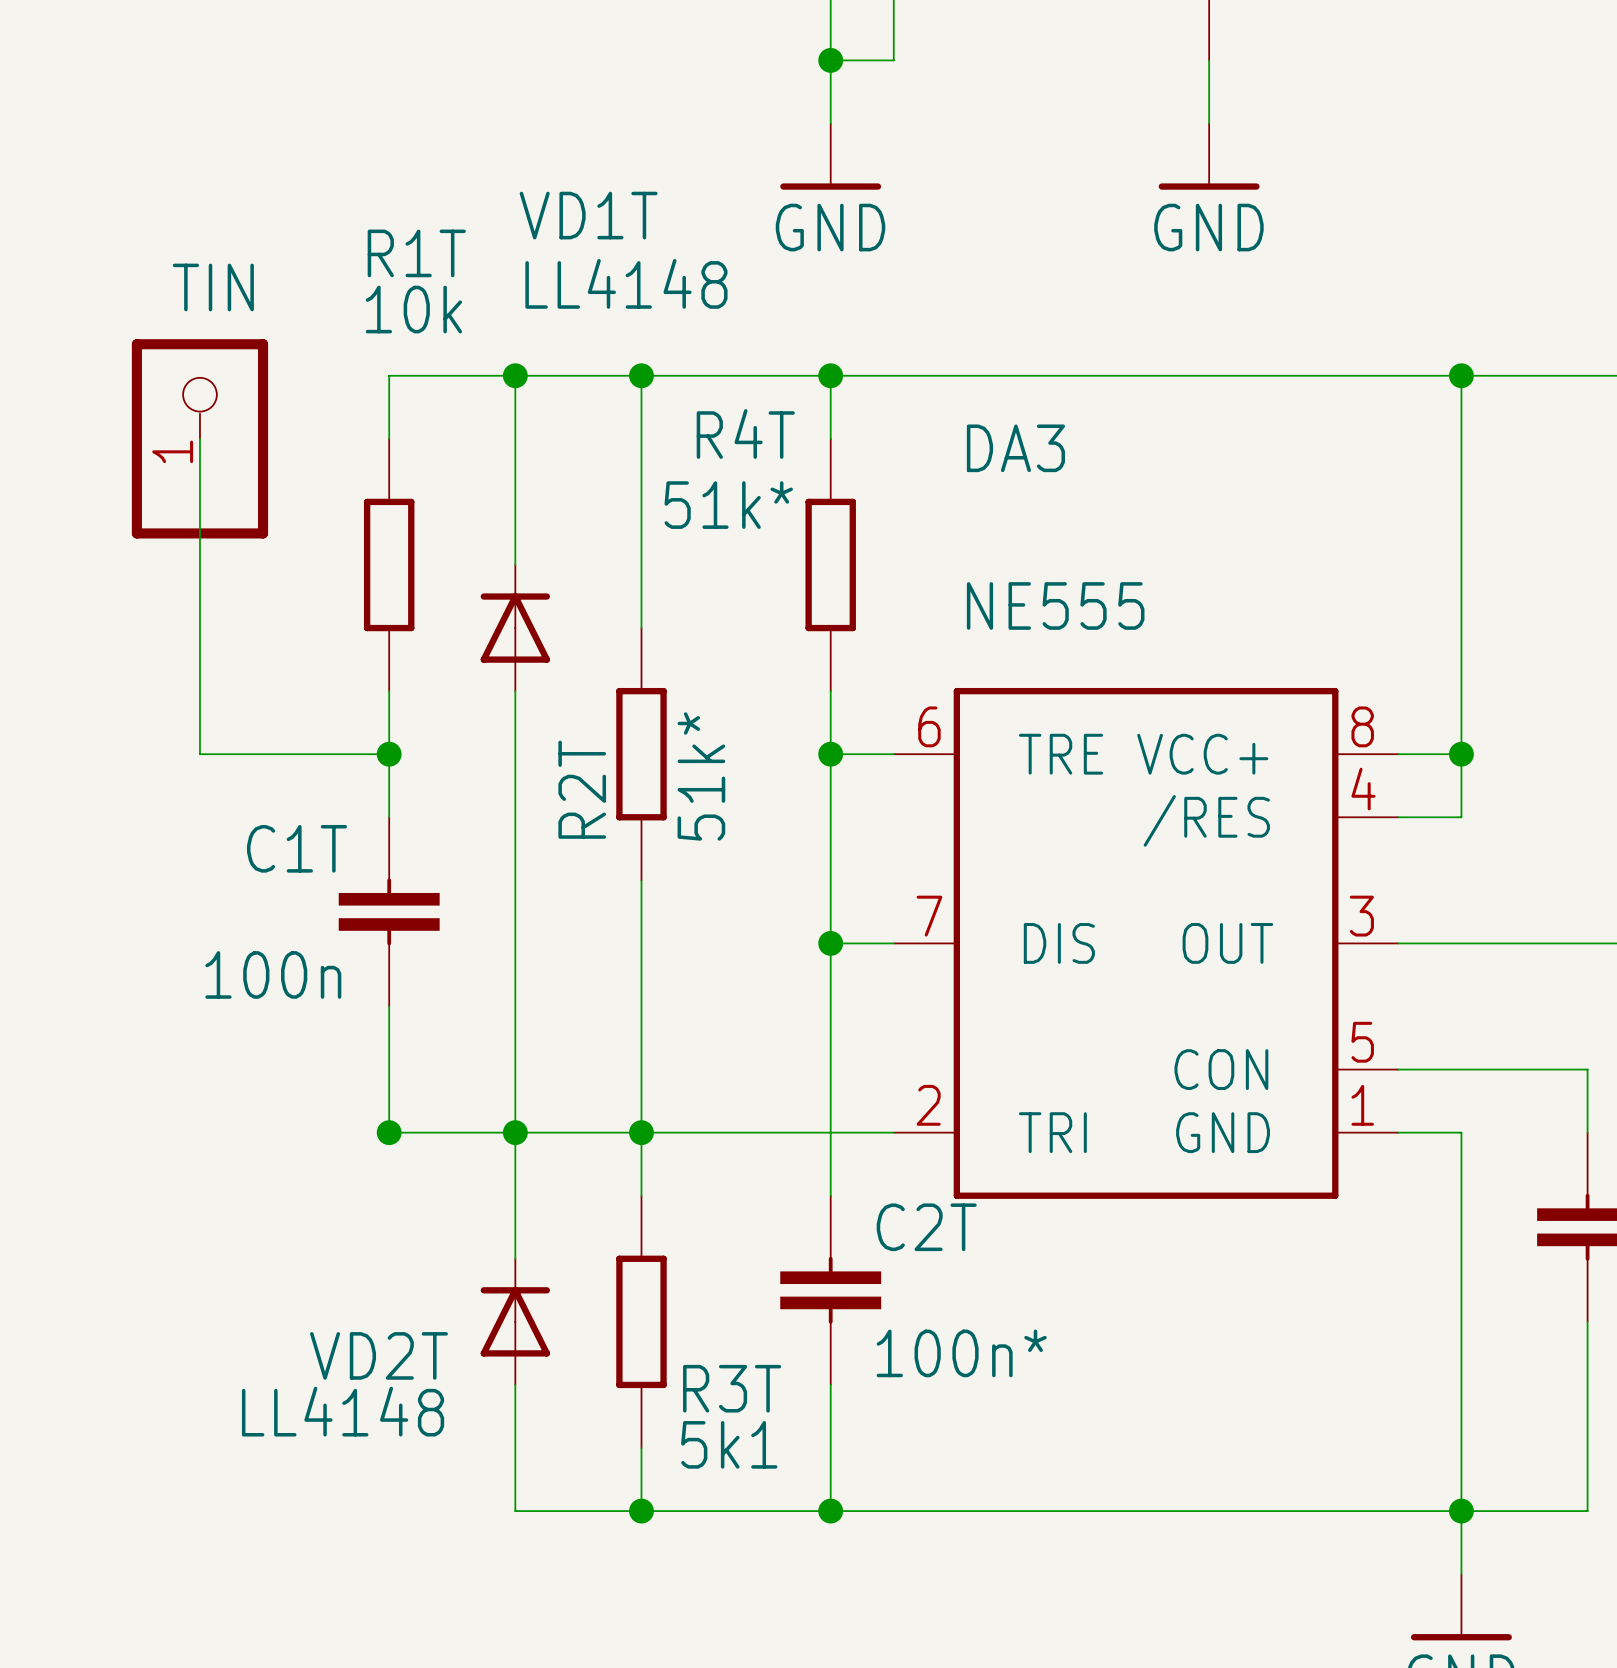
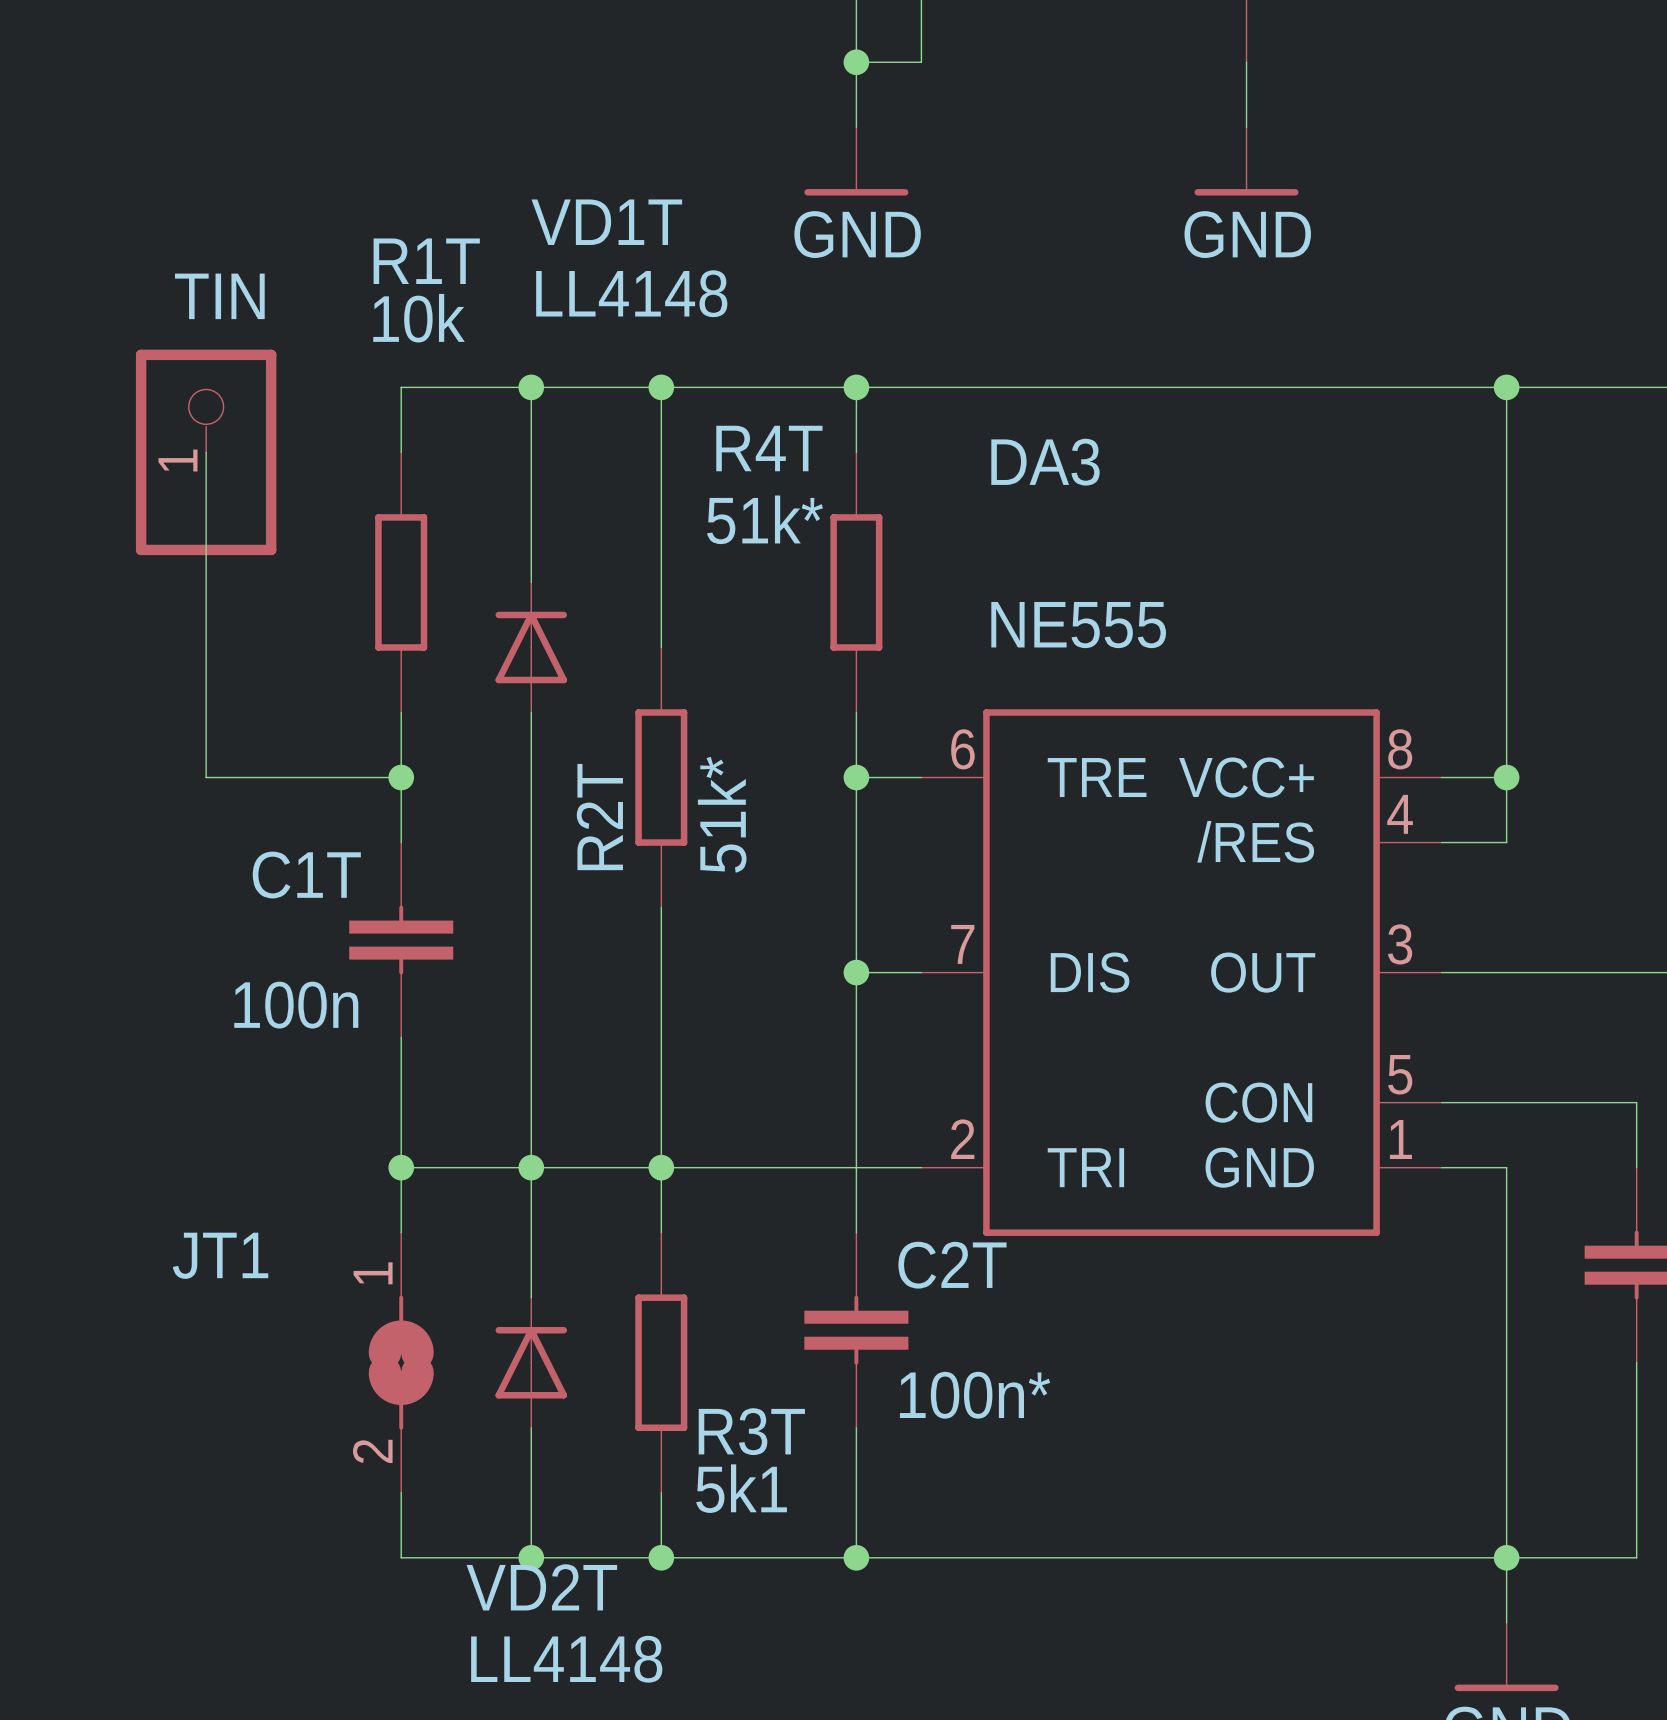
wire: none -> (401, 1167) (401, 1232)
JT1: none -> (401, 1362)
VD2T name position: VD2T (378, 1355) -> VD2T (541, 1587)
VD2T value position: LL4148 (343, 1411) -> LL4148 (566, 1659)
wire: none -> (401, 1492) (401, 1557) (531, 1557)
junction: none -> (531, 1557)

